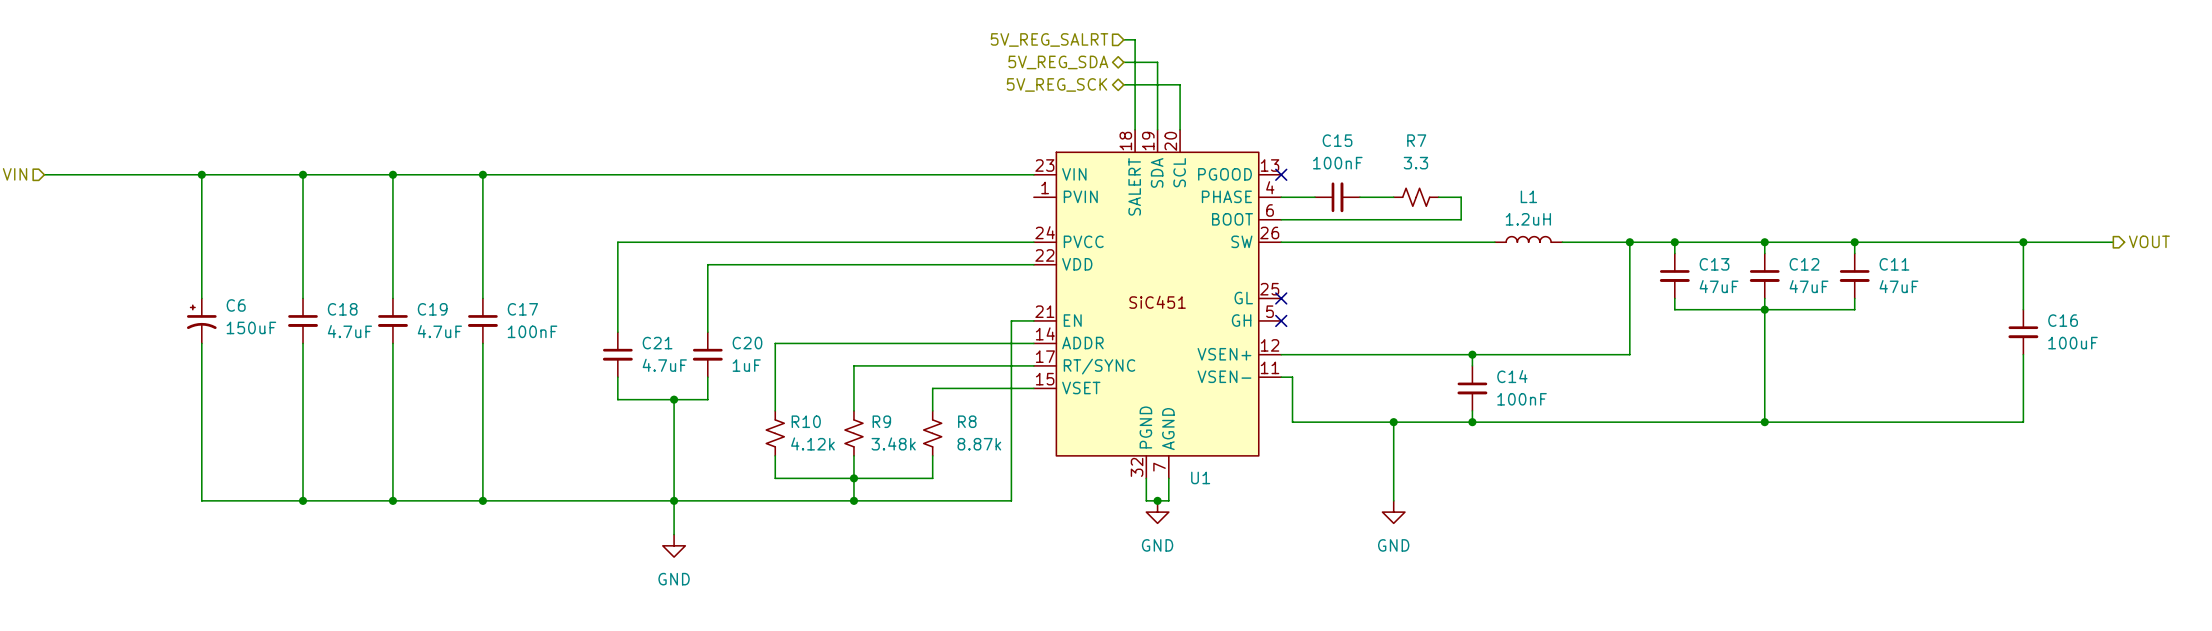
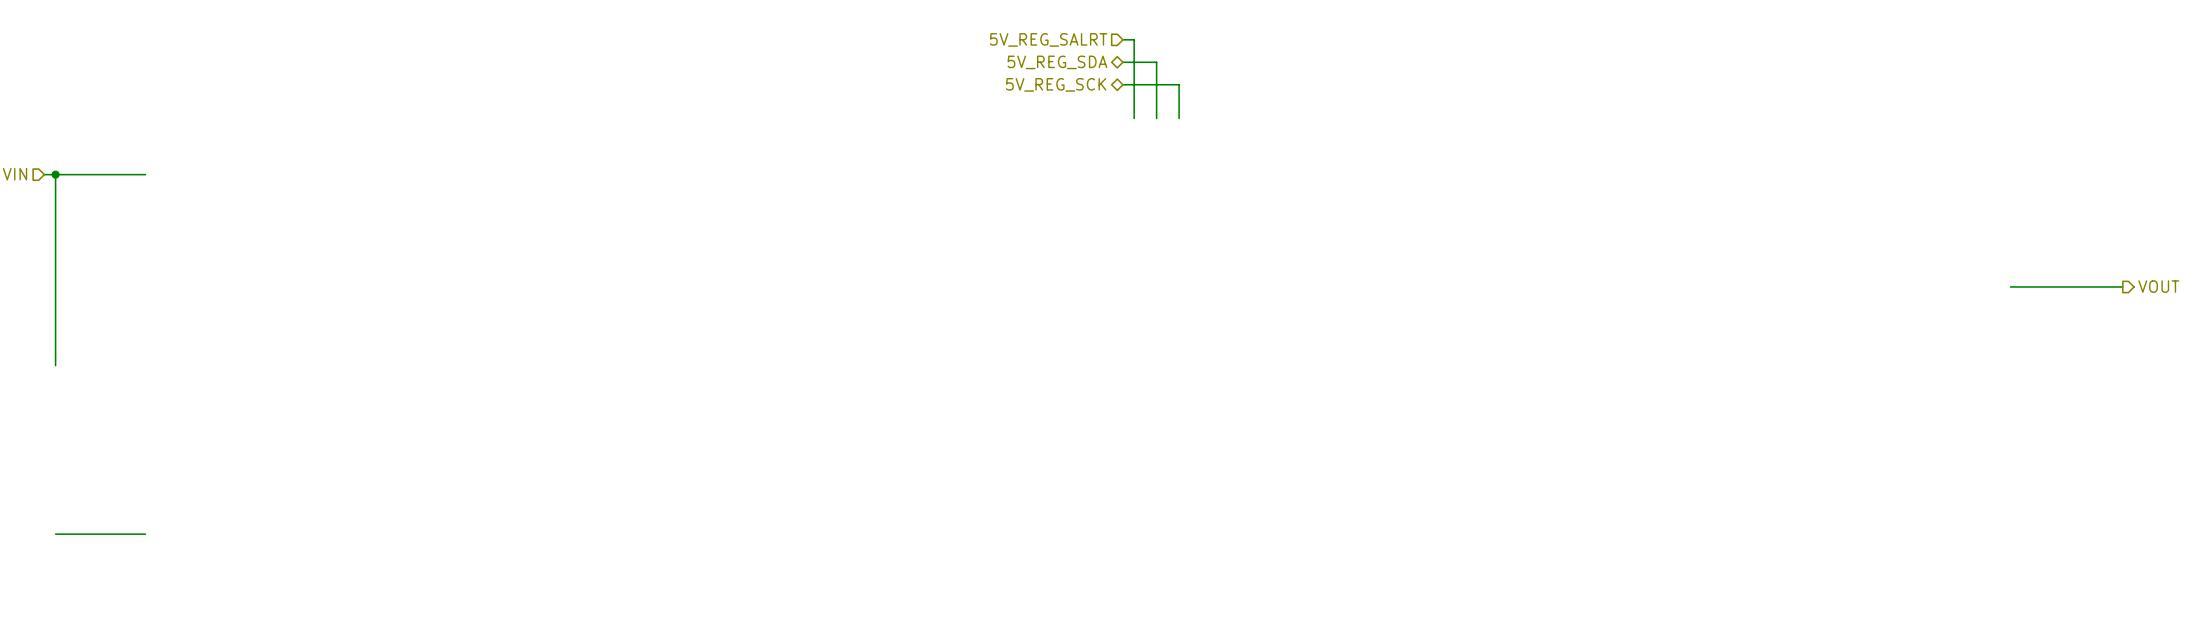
wire: (1135, 118) (1135, 129) -> none
wire: (1157, 118) (1157, 129) -> none
wire: (1180, 118) (1180, 129) -> none
wire: none -> (55, 174) (55, 365)
junction: none -> (55, 174)
wire: (145, 174) (1033, 174) -> none
wire: (201, 174) (201, 298) -> none
junction: (201, 174) -> none
wire: (303, 174) (303, 298) -> none
junction: (303, 174) -> none
wire: (392, 174) (392, 298) -> none
junction: (392, 174) -> none
wire: (482, 174) (482, 298) -> none
junction: (482, 174) -> none
no-connect mark: (1281, 174) -> none
wire: (1281, 197) (1314, 197) -> none
C15: 100nF (1337, 197) -> none
wire: (1359, 197) (1393, 197) -> none
R7: 3.3 (1416, 197) -> none
wire: (1438, 197) (1461, 197) (1461, 219) (1281, 219) -> none
L1: 1.2uH (1528, 239) -> none
hierarchical label position: VOUT (2149, 241) -> VOUT (2158, 286)
wire: (1033, 242) (617, 242) (617, 332) -> none
wire: (1281, 242) (1494, 242) -> none
wire: (1562, 242) (2113, 242) -> none
wire: (1629, 242) (1629, 354) (1281, 354) -> none
junction: (1629, 242) -> none
wire: (1674, 242) (1674, 253) -> none
junction: (1674, 242) -> none
wire: (1764, 242) (1764, 253) -> none
junction: (1764, 242) -> none
wire: (1854, 242) (1854, 253) -> none
junction: (1854, 242) -> none
wire: (2023, 242) (2023, 309) -> none
junction: (2023, 242) -> none
wire: (1033, 264) (707, 264) (707, 332) -> none
C13: 47uF (1674, 275) -> none
C12: 47uF (1764, 275) -> none
C11: 47uF (1854, 275) -> none
wire: none -> (2010, 286) (2122, 286)
no-connect mark: (1281, 298) -> none
wire: (1674, 298) (1674, 309) (1854, 309) (1854, 298) -> none
wire: (1764, 298) (1764, 422) -> none
U1: (1157, 304) -> none
junction: (1764, 309) -> none
C6: 150uF (201, 320) -> none
C18: 4.7uF (303, 320) -> none
C19: 4.7uF (392, 320) -> none
C17: 100nF (482, 320) -> none
wire: (1033, 320) (1011, 320) (1011, 500) (201, 500) (201, 343) -> none
no-connect mark: (1281, 320) -> none
C16: 100uF (2023, 332) -> none
wire: (303, 343) (303, 500) -> none
wire: (392, 343) (392, 500) -> none
wire: (482, 343) (482, 500) -> none
wire: (1033, 343) (775, 343) (775, 410) -> none
C21: 4.7uF (617, 354) -> none
C20: 1uF (707, 354) -> none
wire: (1472, 354) (1472, 365) -> none
junction: (1472, 354) -> none
wire: (2023, 354) (2023, 422) (1292, 422) (1292, 377) (1281, 377) -> none
wire: (1033, 365) (853, 365) (853, 410) -> none
wire: (617, 377) (617, 399) (707, 399) (707, 377) -> none
wire: (1033, 388) (932, 388) (932, 410) -> none
C14: 100nF (1472, 388) -> none
wire: (674, 399) (674, 534) -> none
junction: (674, 399) -> none
wire: (1472, 410) (1472, 422) -> none
wire: (1393, 422) (1393, 500) -> none
junction: (1393, 422) -> none
junction: (1472, 422) -> none
junction: (1764, 422) -> none
R10: 4.12k (775, 433) -> none
R9: 3.48k (853, 433) -> none
R8: 8.87k (932, 433) -> none
wire: (775, 455) (775, 478) (932, 478) (932, 455) -> none
wire: (853, 455) (853, 500) -> none
junction: (853, 478) -> none
wire: (1146, 478) (1146, 500) (1168, 500) (1168, 478) -> none
junction: (303, 500) -> none
junction: (392, 500) -> none
junction: (482, 500) -> none
junction: (674, 500) -> none
junction: (853, 500) -> none
junction: (1157, 500) -> none
power symbol: GND (1157, 512) -> none
power symbol: GND (1393, 512) -> none
wire: none -> (55, 534) (145, 534)
power symbol: GND (674, 545) -> none

